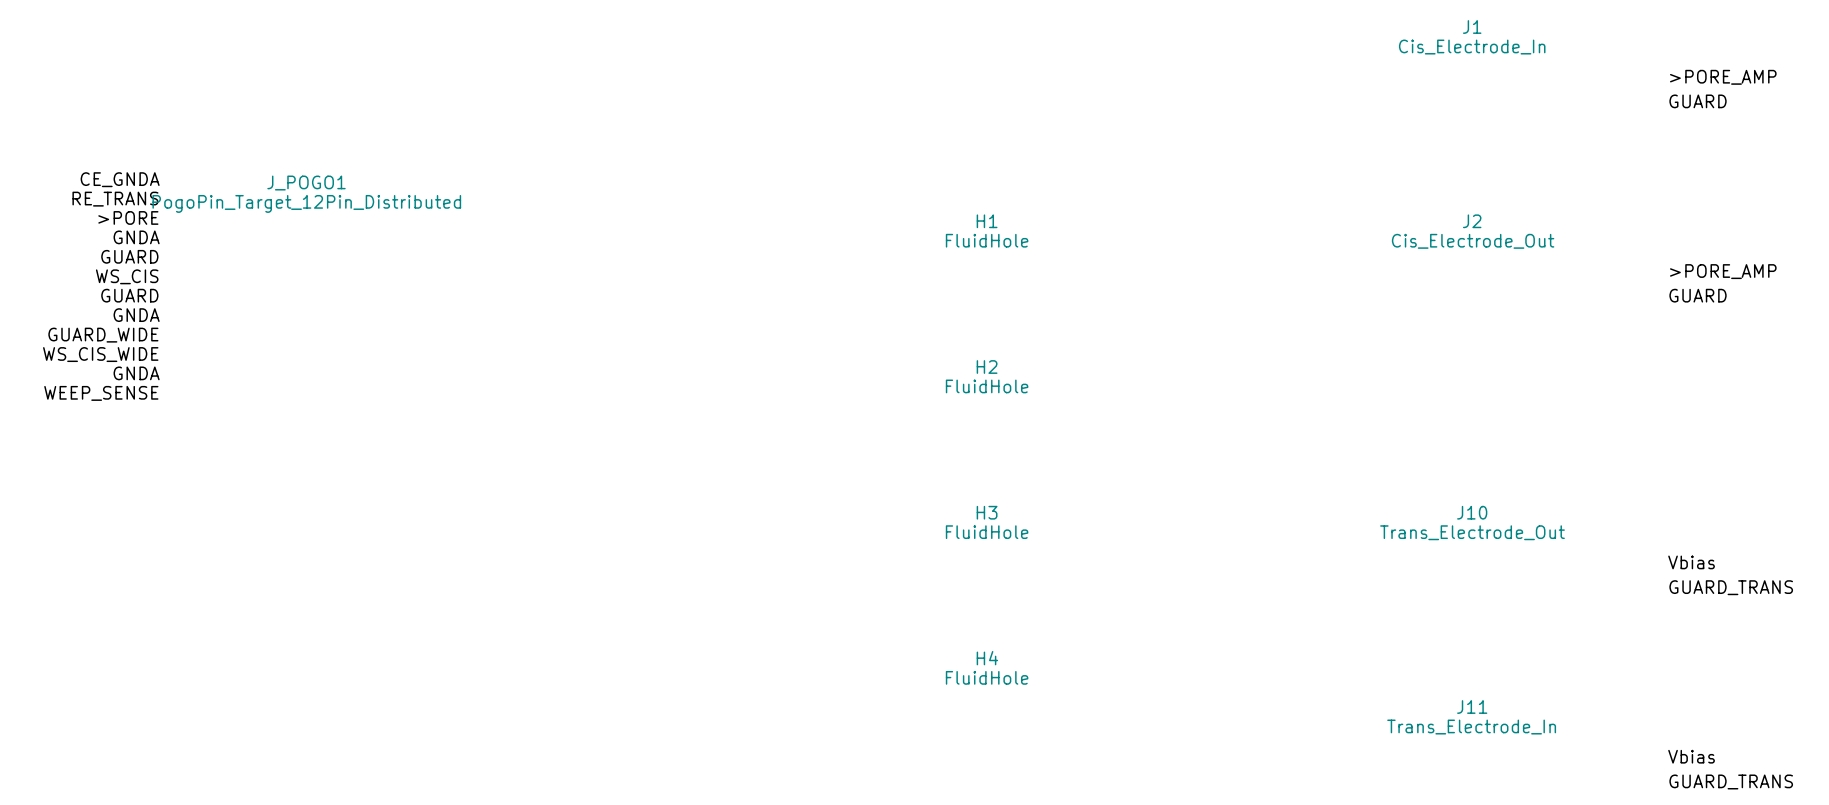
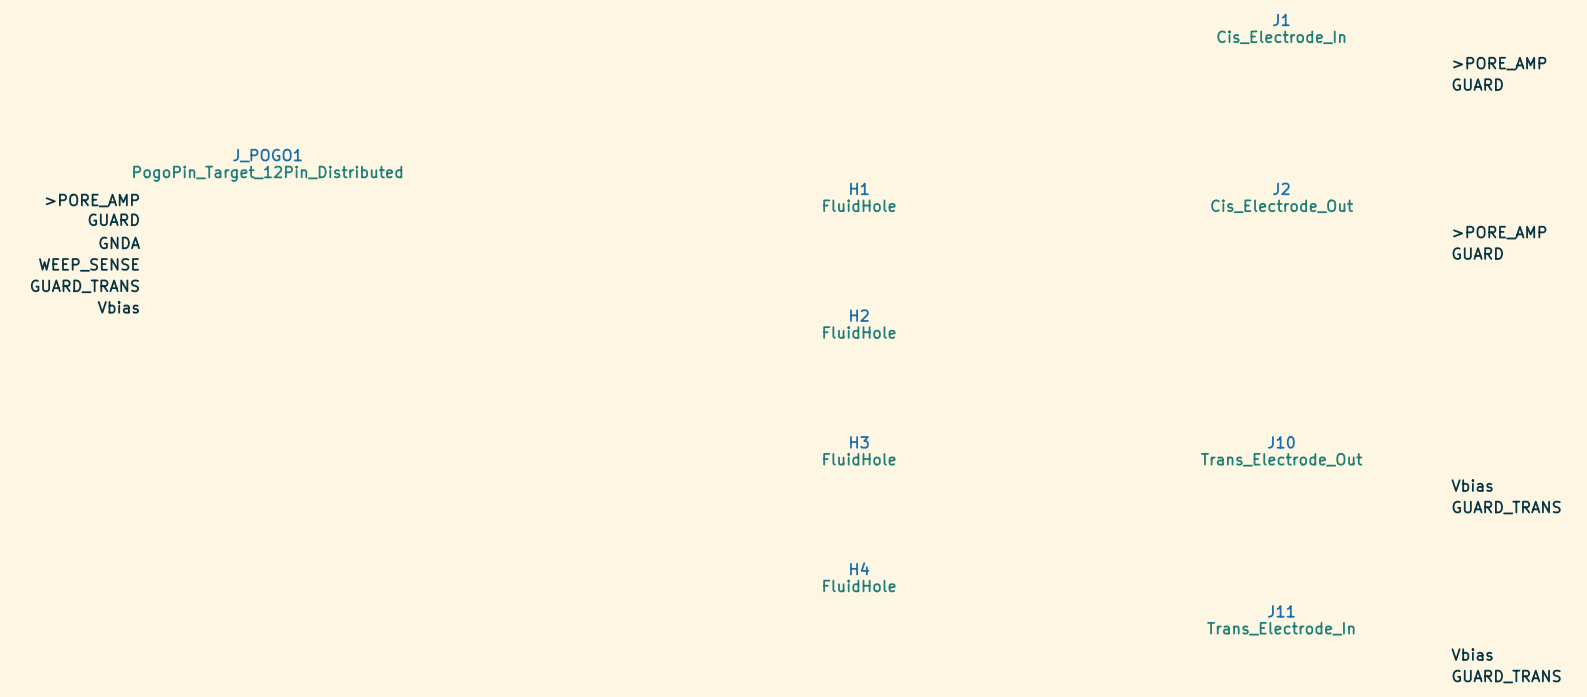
label: CE_GNDA (120, 179) -> none
label: RE_TRANS (115, 199) -> none
label: >PORE (128, 217) -> none
label: GNDA (136, 237) -> >PORE_AMP (92, 200)
label: WS_CIS (127, 276) -> none
label: none -> GNDA (119, 242)
label: GUARD (129, 295) -> none
label: GNDA (136, 315) -> none
label: GUARD_WIDE (103, 335) -> GUARD_TRANS (84, 286)
label: WS_CIS_WIDE (100, 354) -> Vbias (118, 307)
label: GNDA (136, 373) -> none
label position: WEEP_SENSE (101, 393) -> WEEP_SENSE (89, 264)

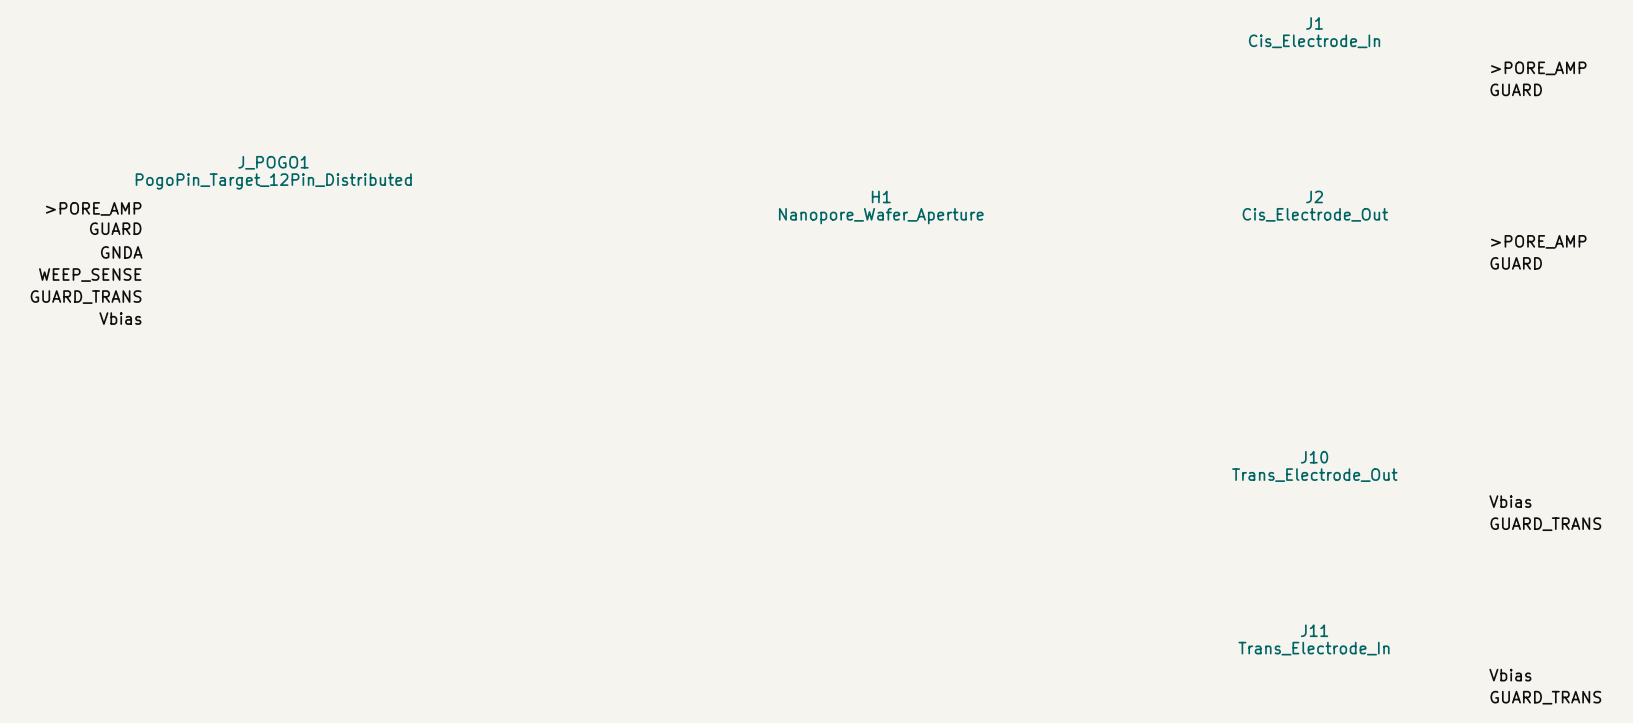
H1 value: FluidHole (859, 205) -> Nanopore_Wafer_Aperture (881, 216)
H2: FluidHole (859, 324) -> none
H3: FluidHole (859, 450) -> none
H4: FluidHole (859, 577) -> none

